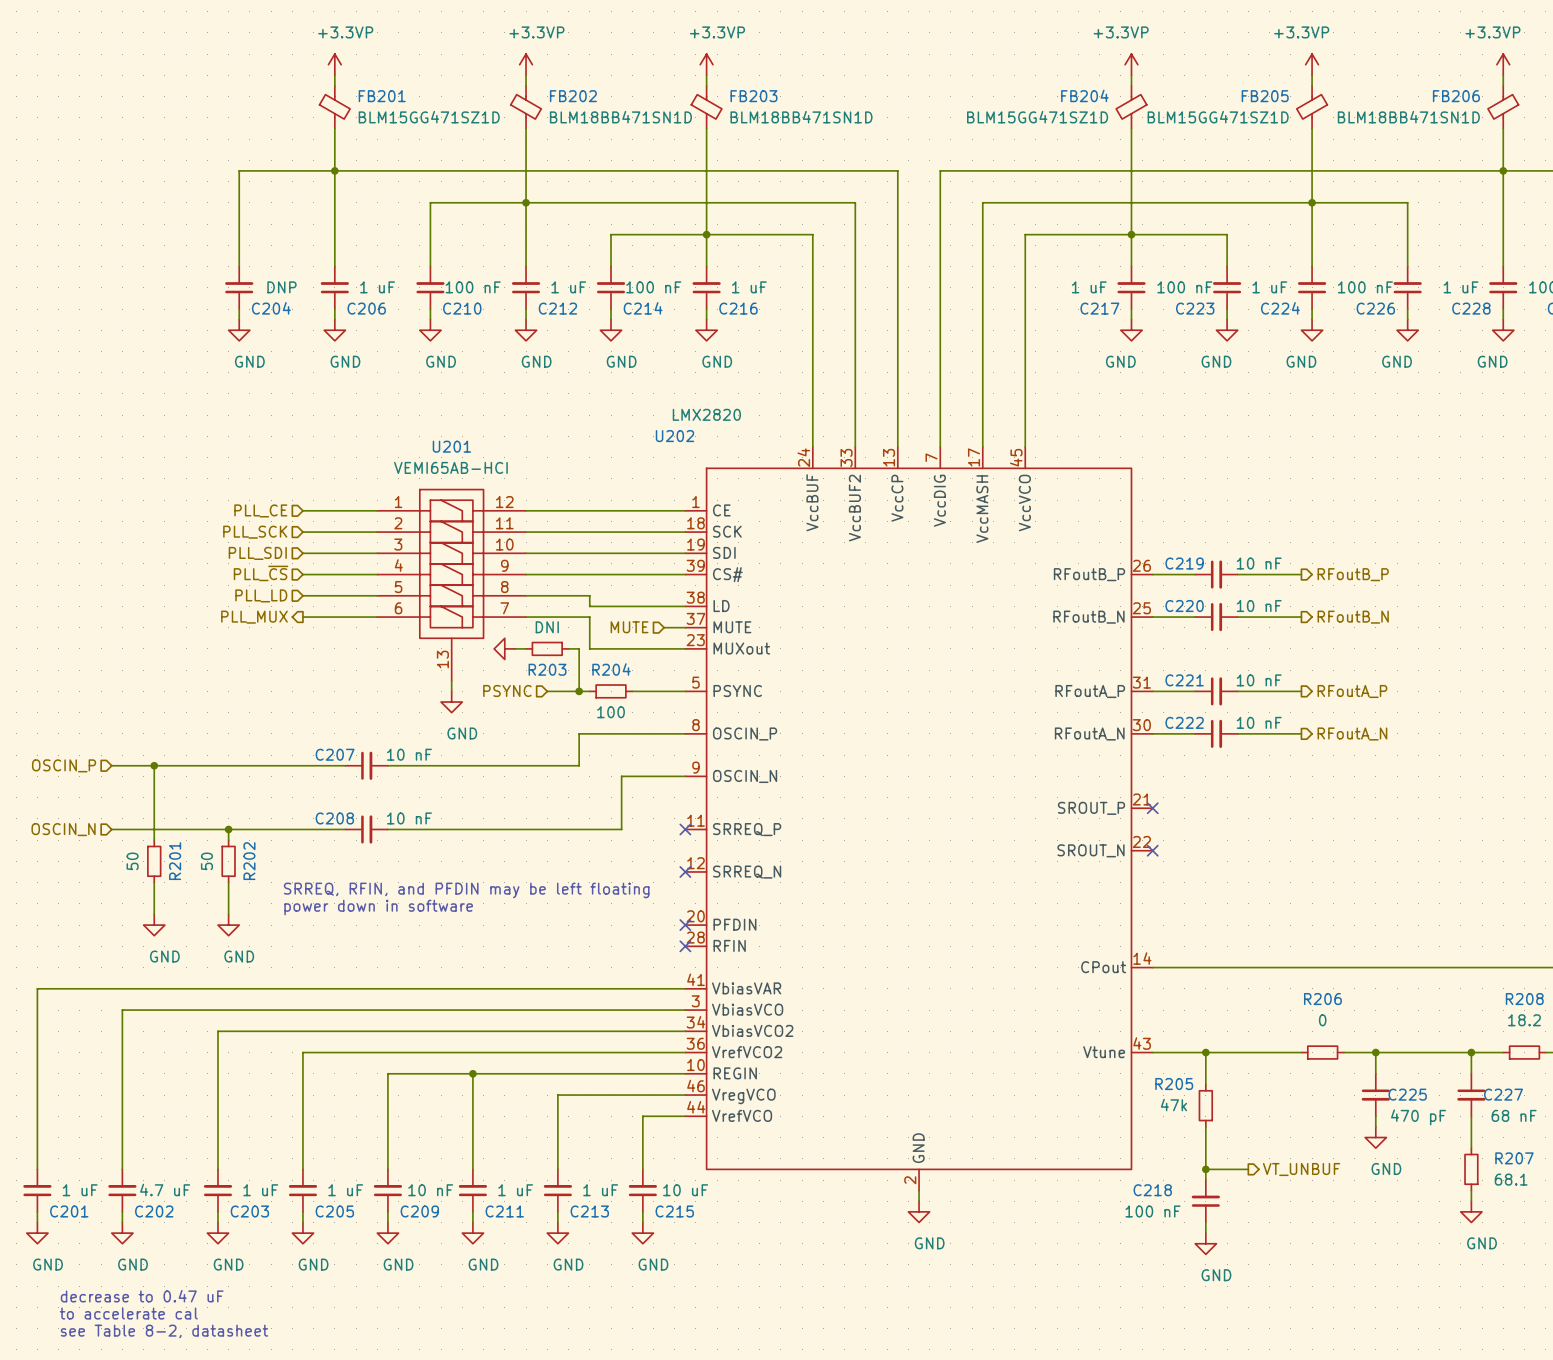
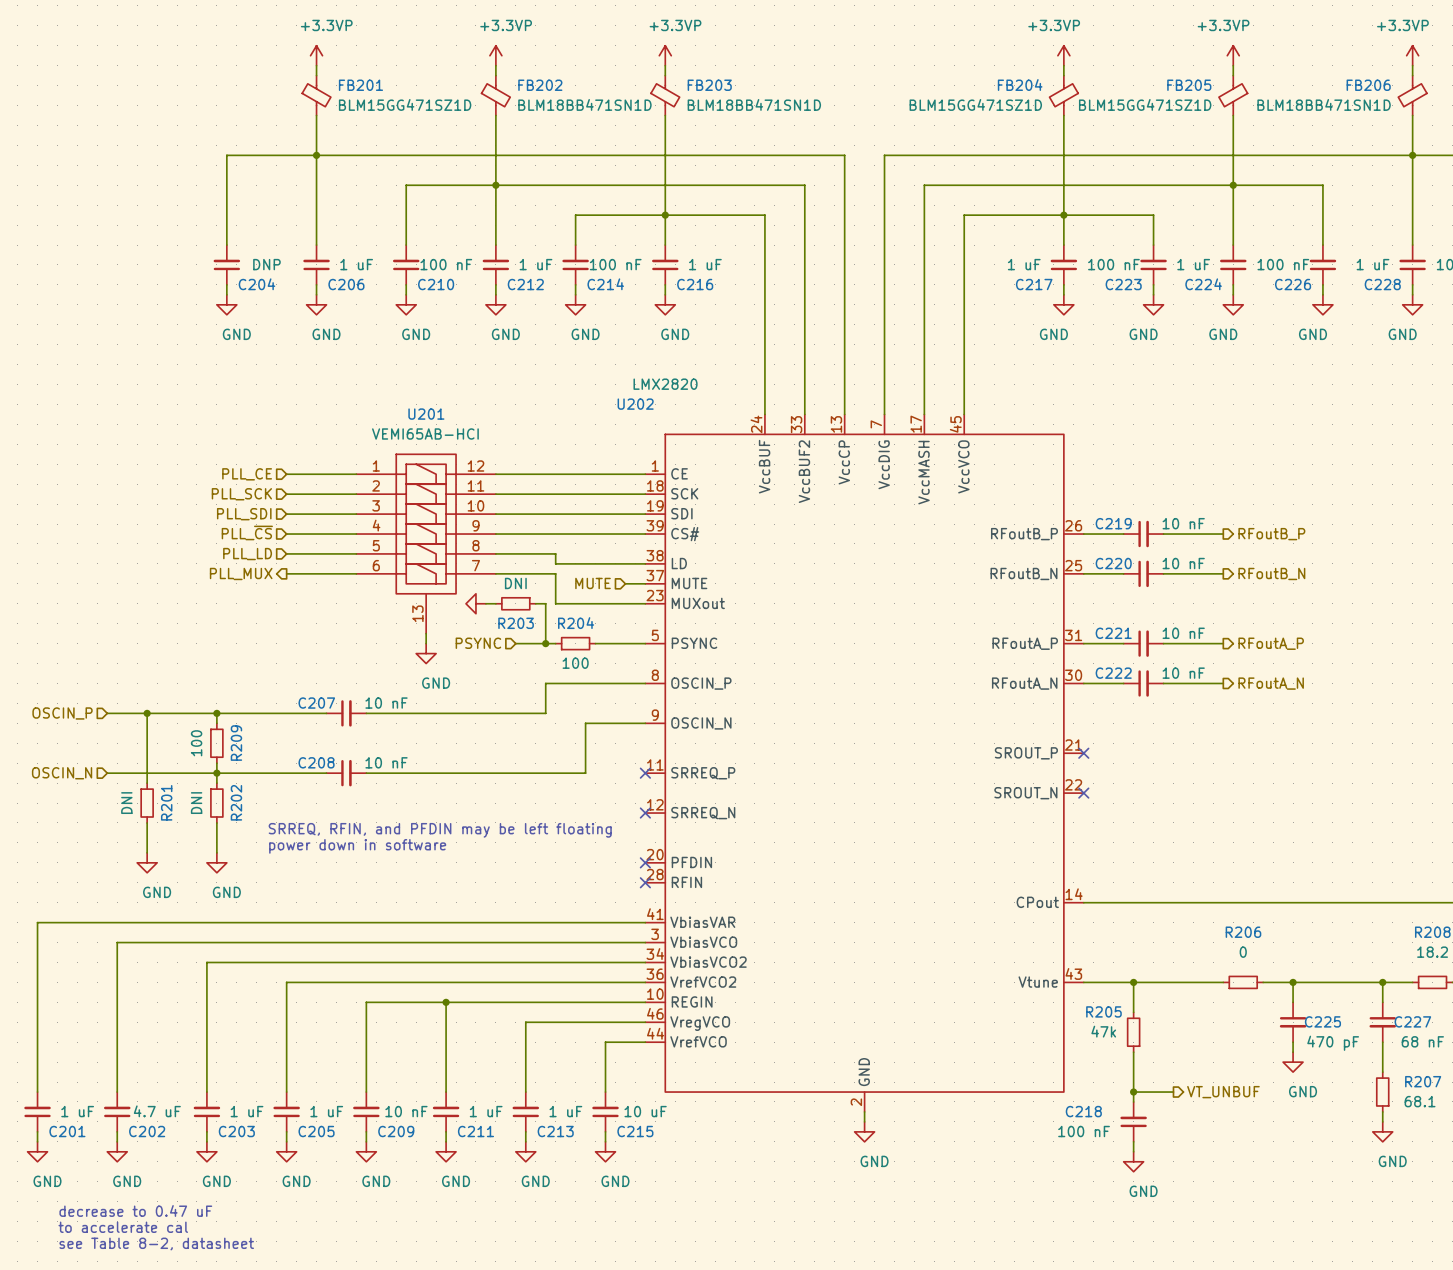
wire: none -> (216, 713) (216, 723)
junction: none -> (216, 713)
R209: none -> 100 (216, 743)
wire: none -> (216, 763) (216, 773)
R201 value: 50 (132, 861) -> DNI (126, 803)
R202 value: 50 (206, 861) -> DNI (196, 803)

